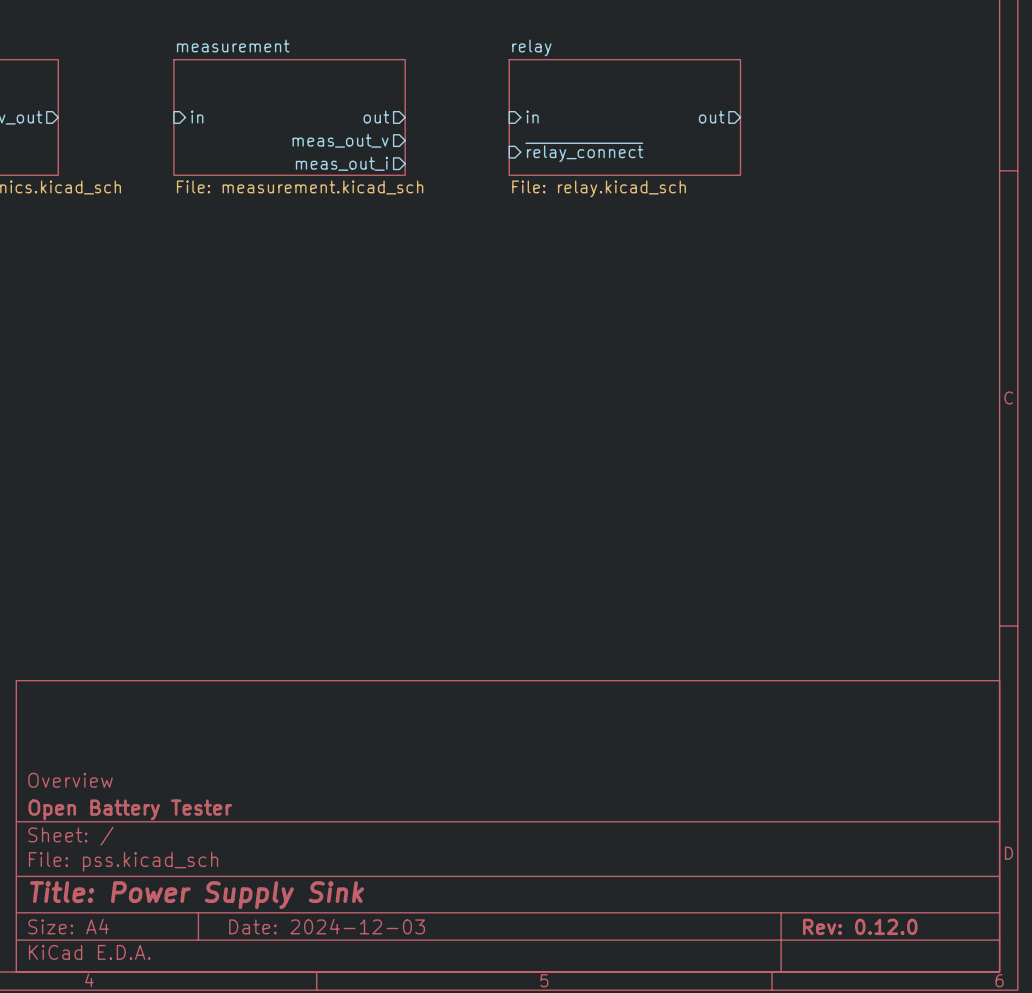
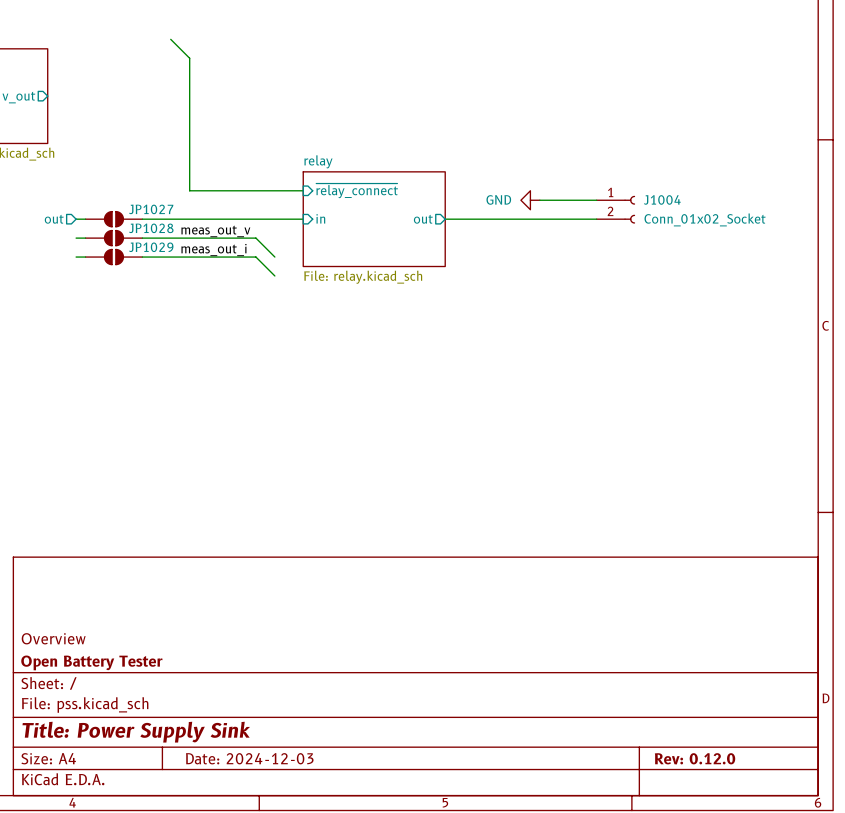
wire: none -> (170, 39) (189, 58) (189, 190) (303, 190)
sheet pin: in (197, 117) -> none
sheet measurement: File: measurement.kicad_sch (289, 117) -> none
sheet pin: out (376, 117) -> none
sheet pin: in (532, 117) -> none
sheet relay: File: relay.kicad_sch (624, 117) -> none
sheet pin: out (711, 117) -> none
sheet pin: meas_out_v (340, 140) -> none
sheet pin position: ~{relay_connect} (584, 152) -> ~{relay_connect} (357, 190)
sheet pin: meas_out_i (341, 163) -> none
power symbol: none -> GND (530, 200)
wire: none -> (539, 200) (596, 200)
J1004: none -> Conn_01x02_Socket (615, 209)
sheet pin: none -> out (54, 219)
wire: none -> (76, 219) (85, 219)
JP1027: none -> (113, 219)
wire: none -> (142, 219) (303, 219)
sheet pin: none -> in (320, 218)
sheet relay: none -> File: relay.kicad_sch (374, 219)
sheet pin: none -> out (423, 219)
wire: none -> (445, 219) (596, 219)
label: none -> meas_out_v (215, 231)
wire: none -> (76, 238) (85, 238)
JP1028: none -> (113, 238)
wire: none -> (142, 238) (255, 238) (274, 257)
label: none -> meas_out_i (213, 250)
wire: none -> (76, 257) (85, 257)
JP1029: none -> (113, 257)
wire: none -> (142, 257) (255, 257) (274, 275)

